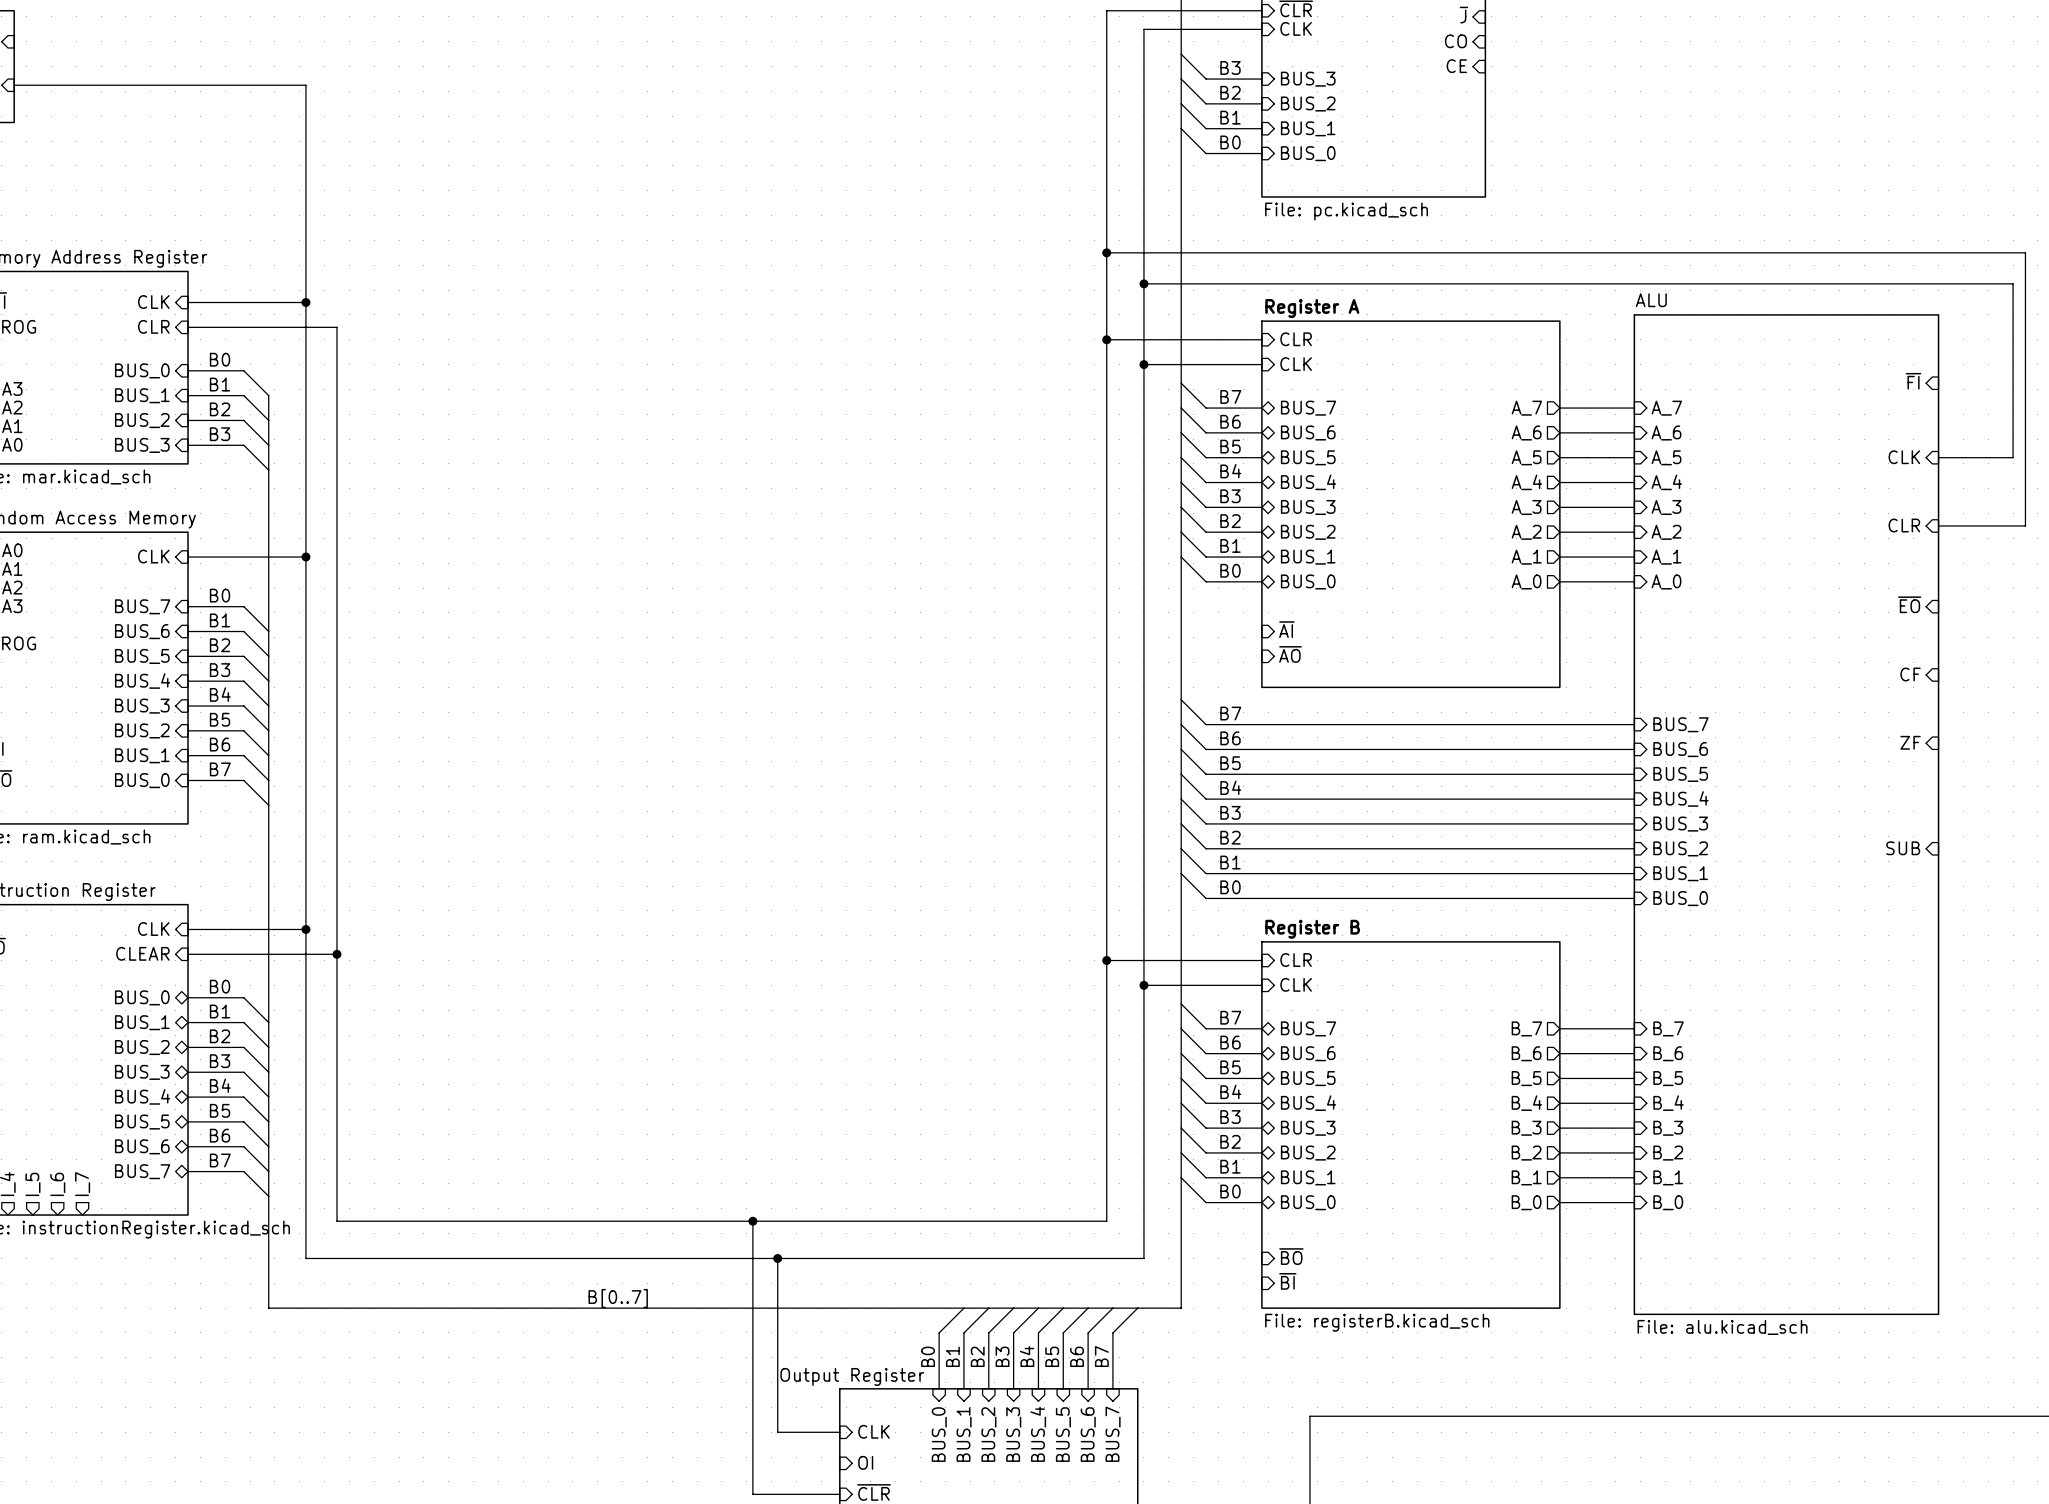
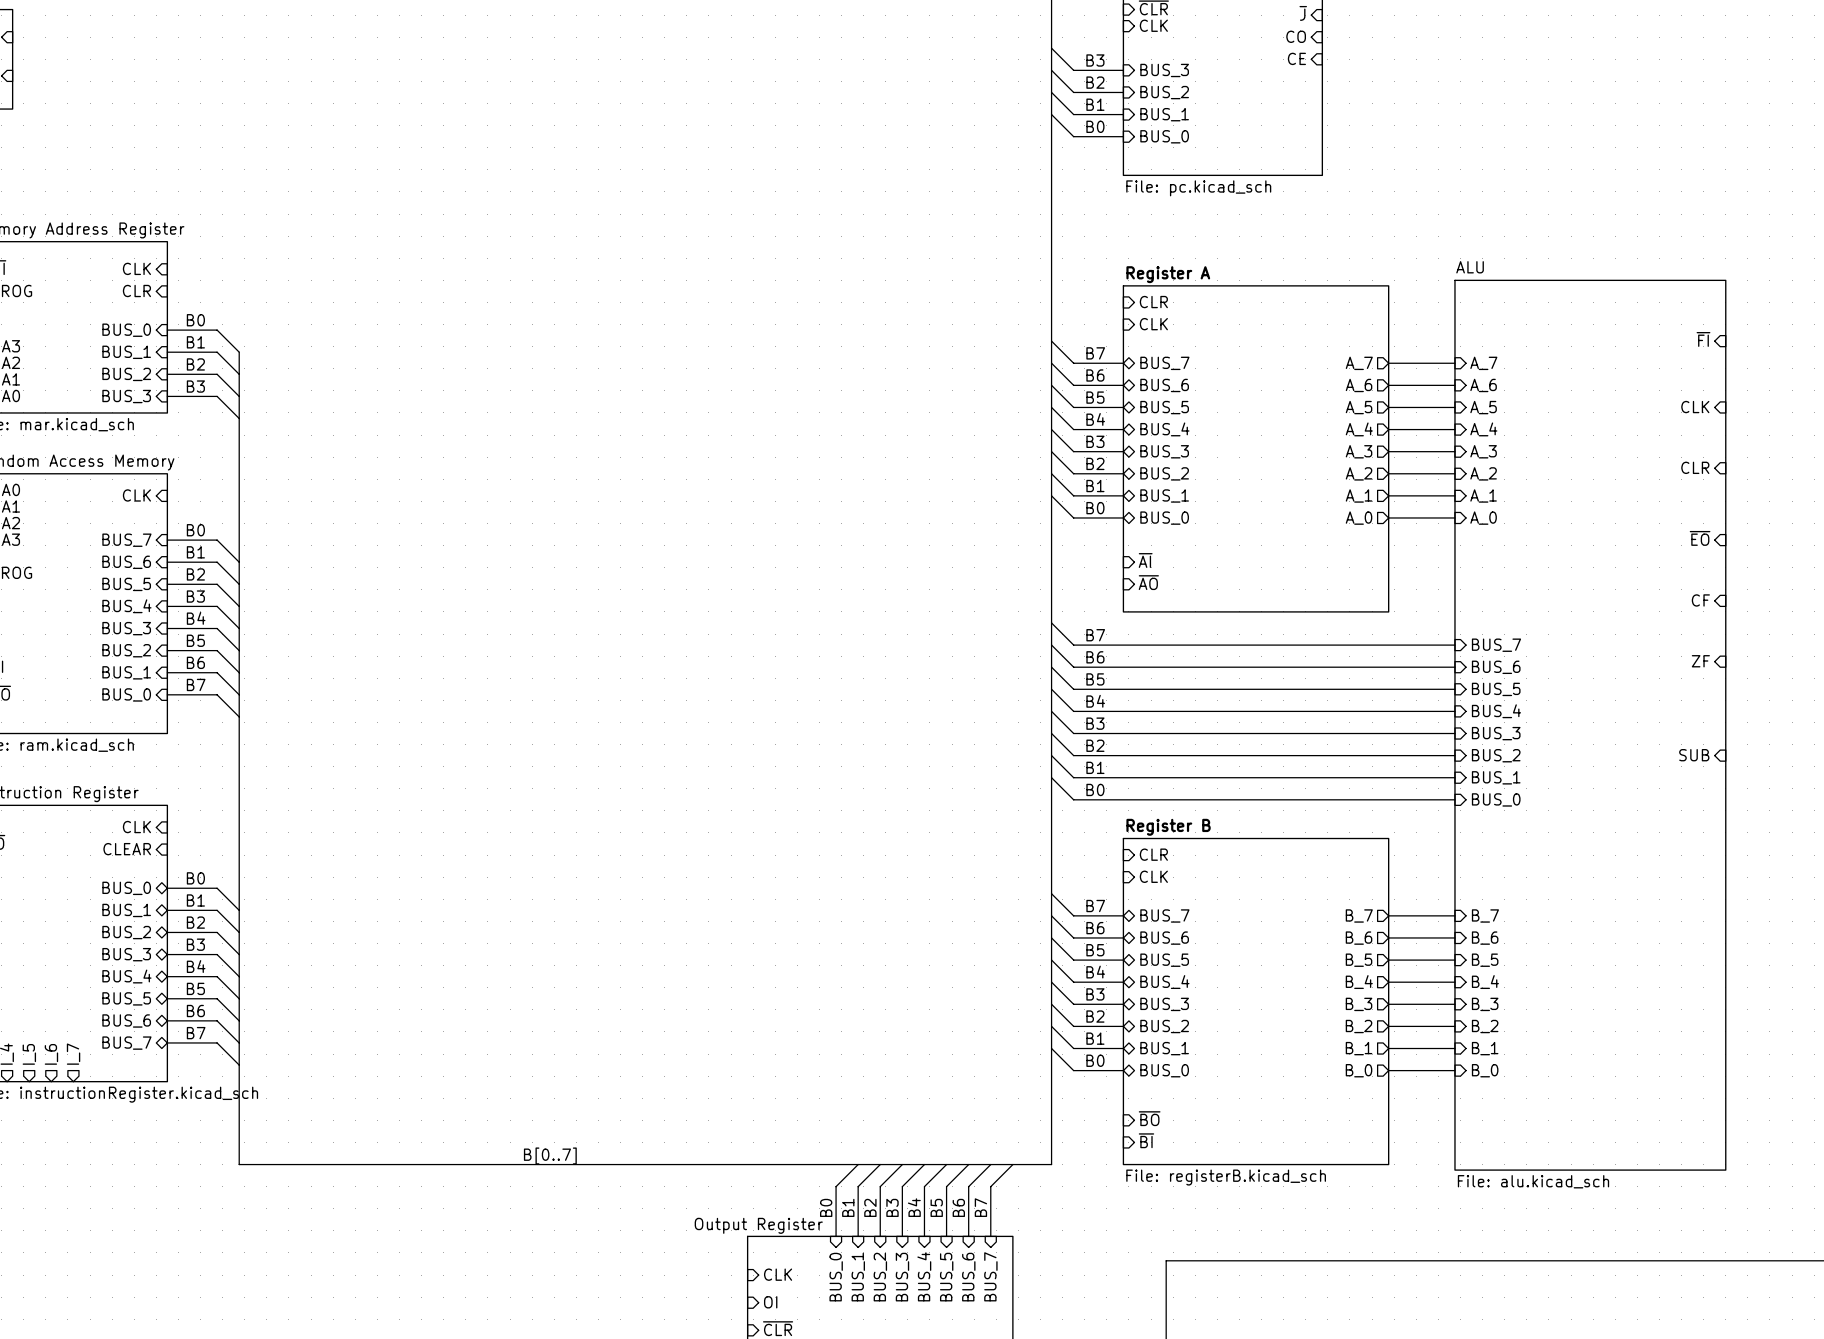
wire: (1261, 10) (1106, 10) (1106, 1221) (336, 1221) (336, 327) (188, 327) -> none
wire: (1261, 29) (1143, 29) (1143, 1258) (305, 1258) (305, 929) -> none
wire: (14, 85) (305, 85) (305, 929) -> none
wire: (1106, 252) (2025, 252) (2025, 525) (1938, 525) -> none
junction: (1106, 252) -> none
wire: (1143, 283) (2013, 283) (2013, 457) (1938, 457) -> none
junction: (1143, 283) -> none
wire: (188, 302) (305, 302) -> none
junction: (305, 302) -> none
wire: (1106, 339) (1261, 339) -> none
junction: (1106, 339) -> none
wire: (1143, 364) (1261, 364) -> none
junction: (1143, 364) -> none
wire: (188, 557) (305, 557) -> none
junction: (305, 557) -> none
wire: (188, 929) (305, 929) -> none
junction: (305, 929) -> none
wire: (188, 954) (336, 954) -> none
junction: (336, 954) -> none
wire: (1106, 960) (1261, 960) -> none
junction: (1106, 960) -> none
wire: (1143, 985) (1261, 985) -> none
junction: (1143, 985) -> none
wire: (752, 1221) (752, 1494) (839, 1494) -> none
junction: (752, 1221) -> none
wire: (777, 1258) (777, 1432) (839, 1432) -> none
junction: (777, 1258) -> none

